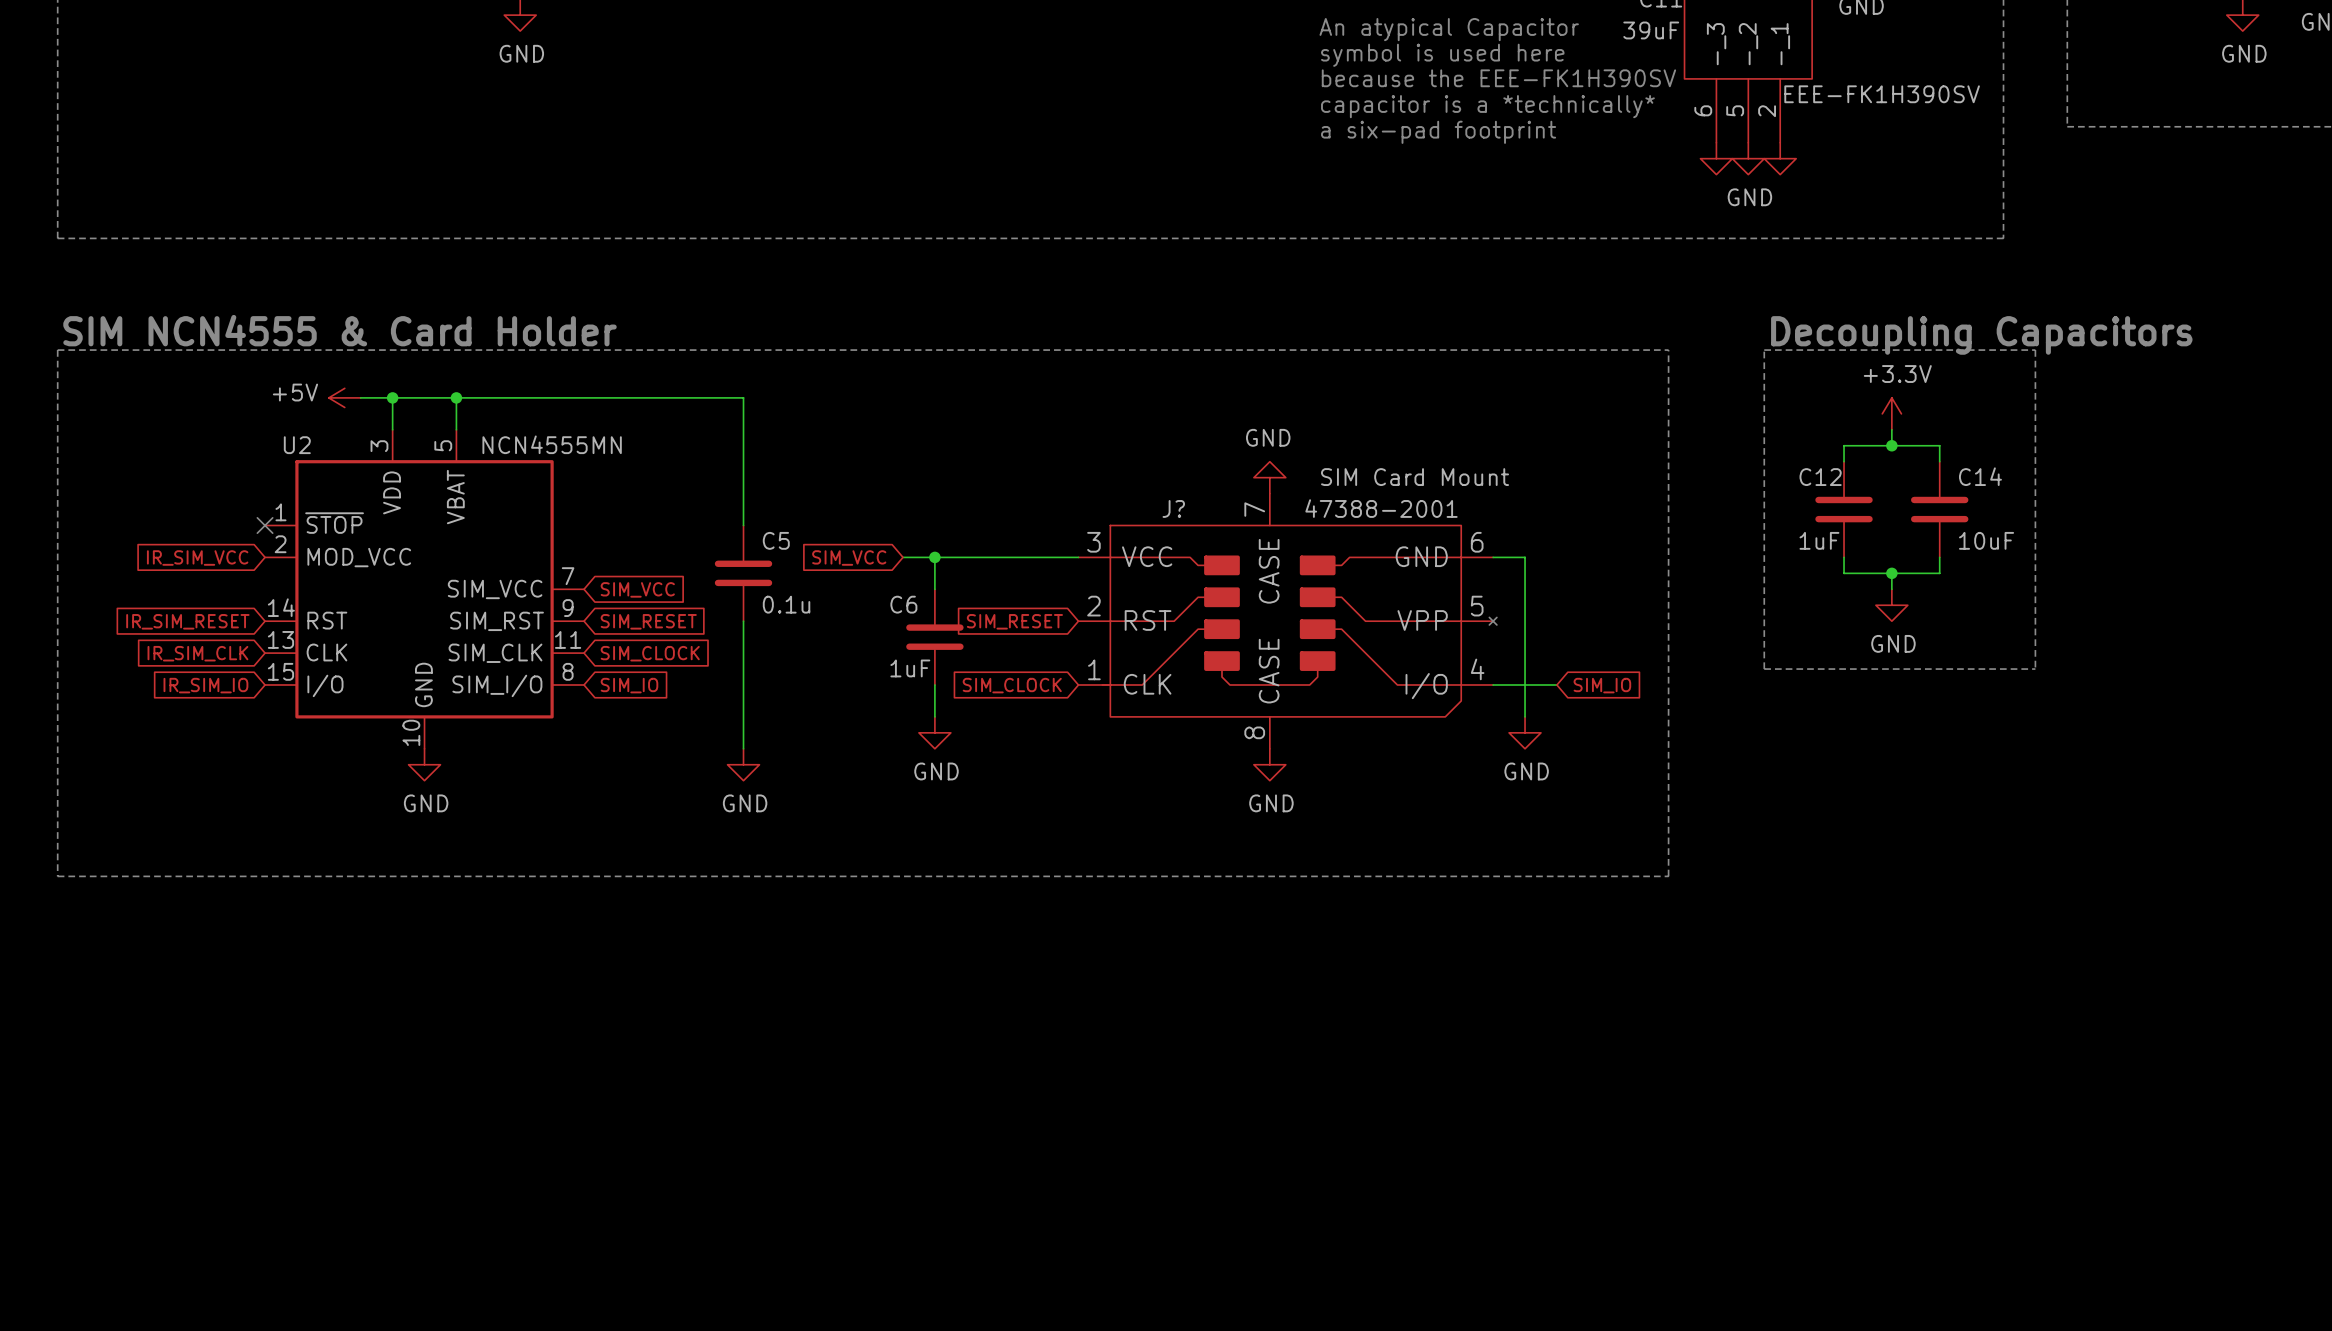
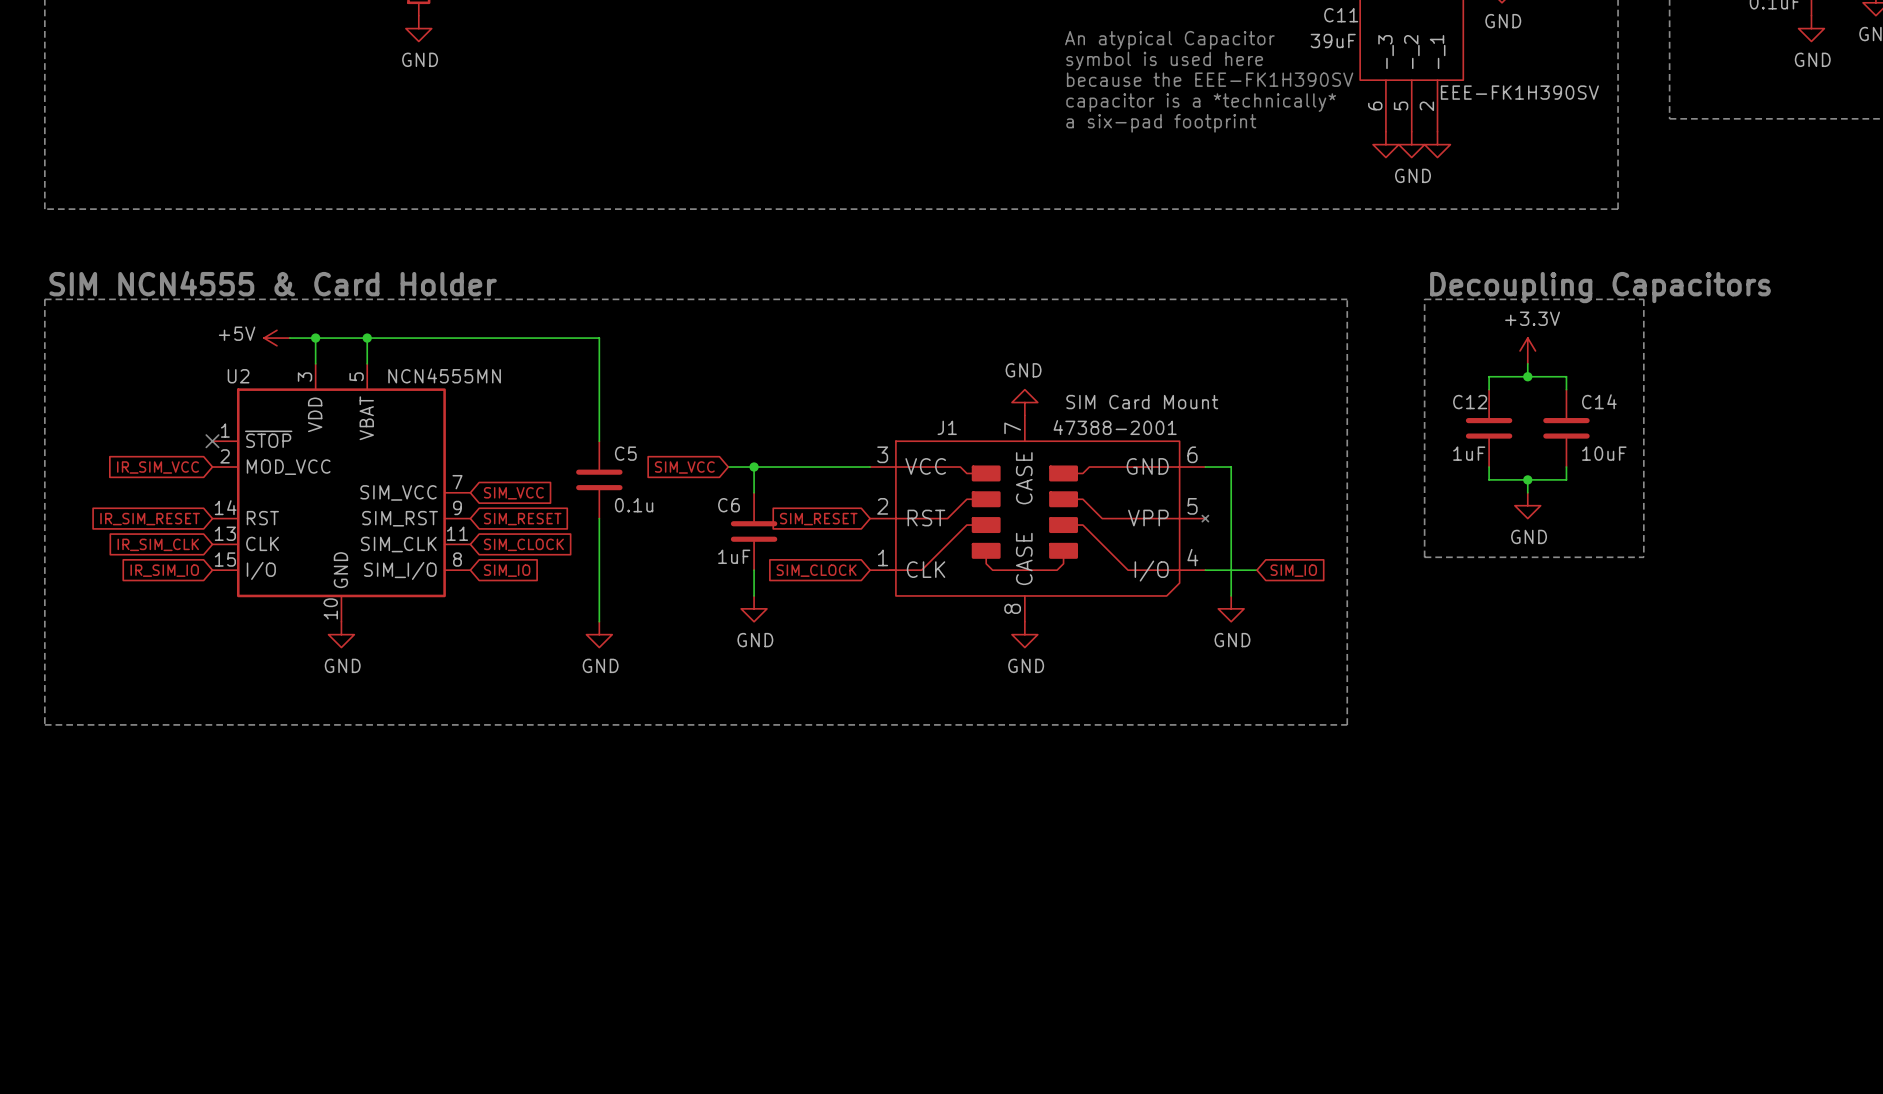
J? name: J? (1173, 508) -> J1 (947, 427)

